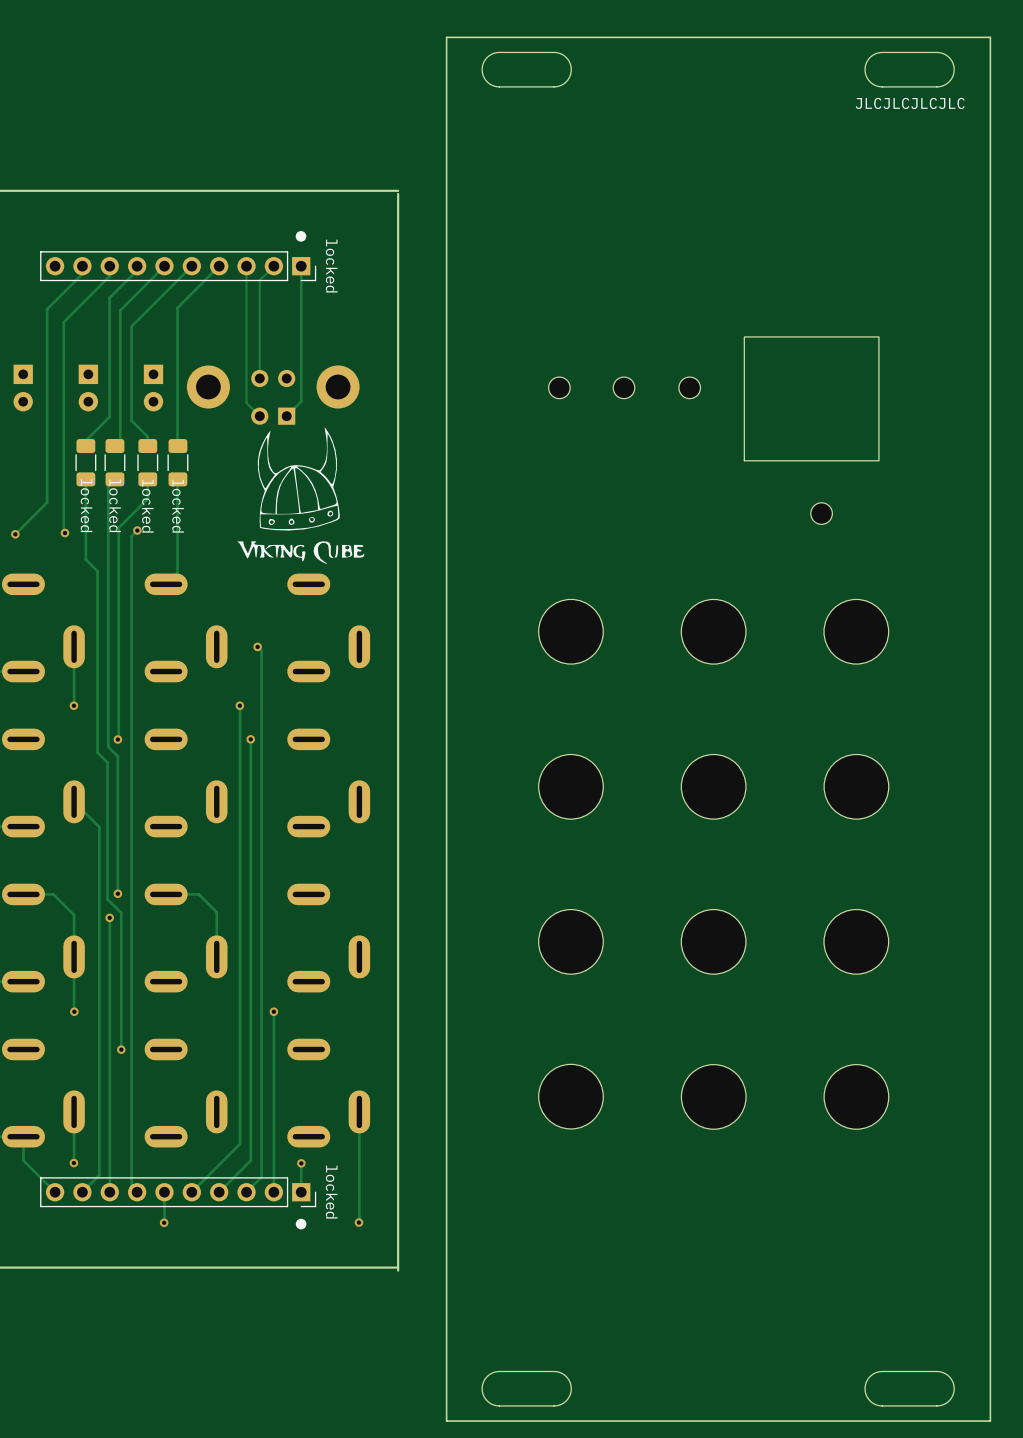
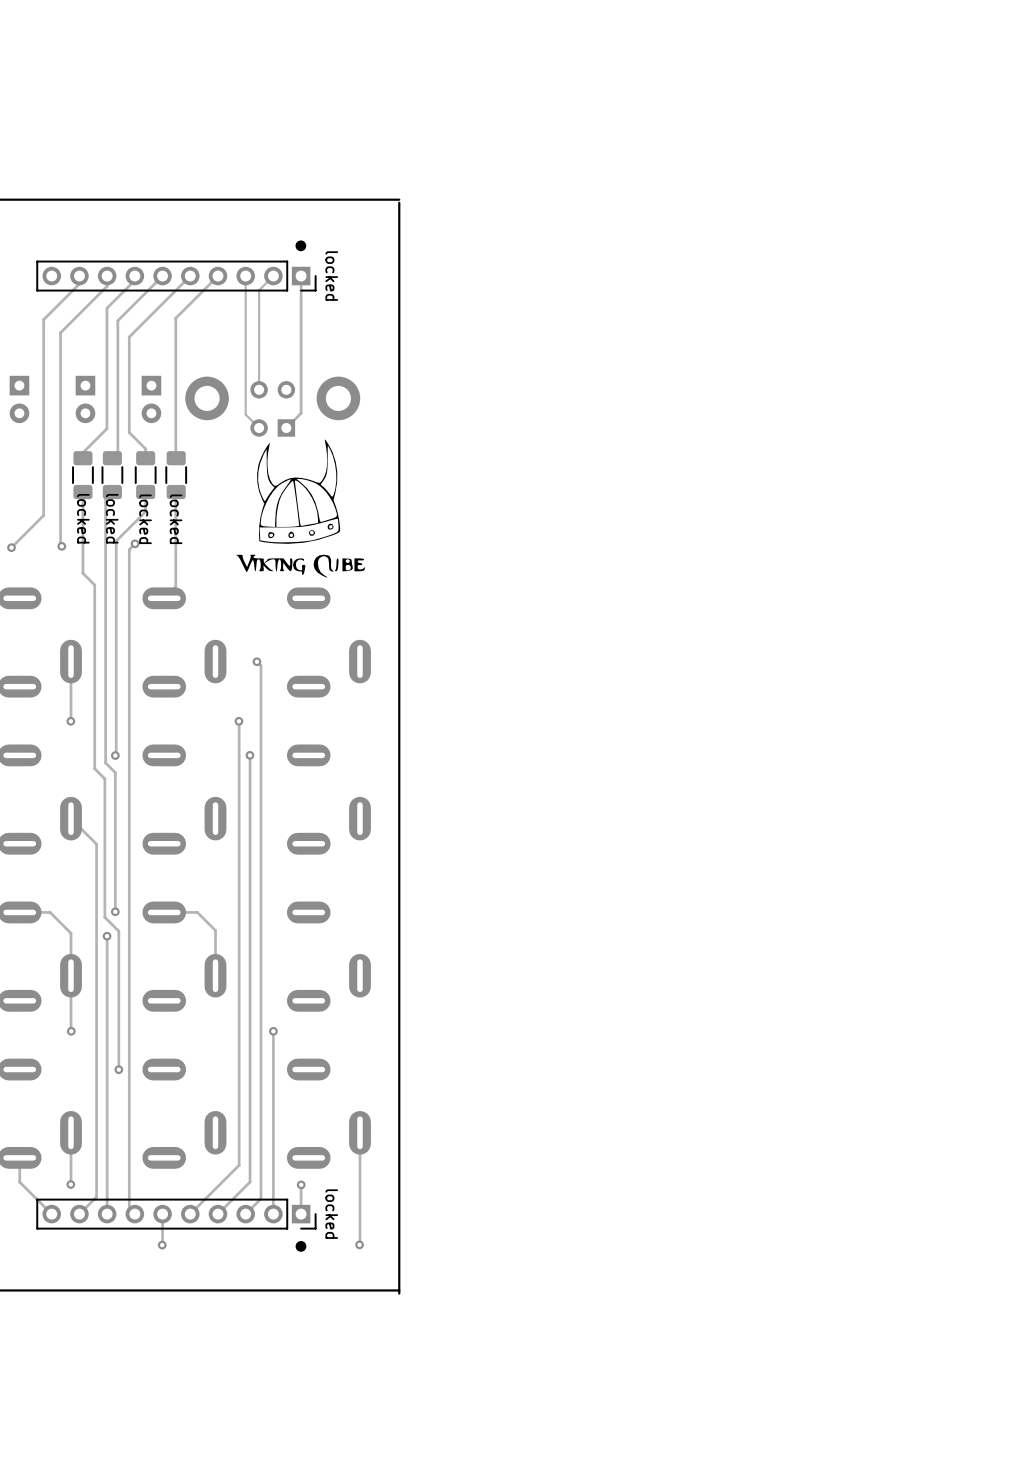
board edge: (990, 37) (990, 1421) (446, 1421) (446, 37) (990, 37) -> none
drawing: [481, 51, 572, 88] -> none
drawing: [864, 51, 955, 88] -> none
text: JLCJLCJLCJLC (910, 103) -> none
drawing: [743, 336, 880, 462] -> none
part: (559, 387) -> none
part: (624, 387) -> none
part: (689, 387) -> none
part: (821, 513) -> none
part: (570, 631) -> none
part: (713, 631) -> none
part: (856, 631) -> none
part: (570, 786) -> none
part: (713, 786) -> none
part: (856, 786) -> none
part: (570, 941) -> none
part: (713, 941) -> none
part: (856, 941) -> none
part: (570, 1096) -> none
part: (713, 1096) -> none
part: (856, 1096) -> none
drawing: [481, 1370, 572, 1407] -> none
drawing: [864, 1370, 955, 1407] -> none

